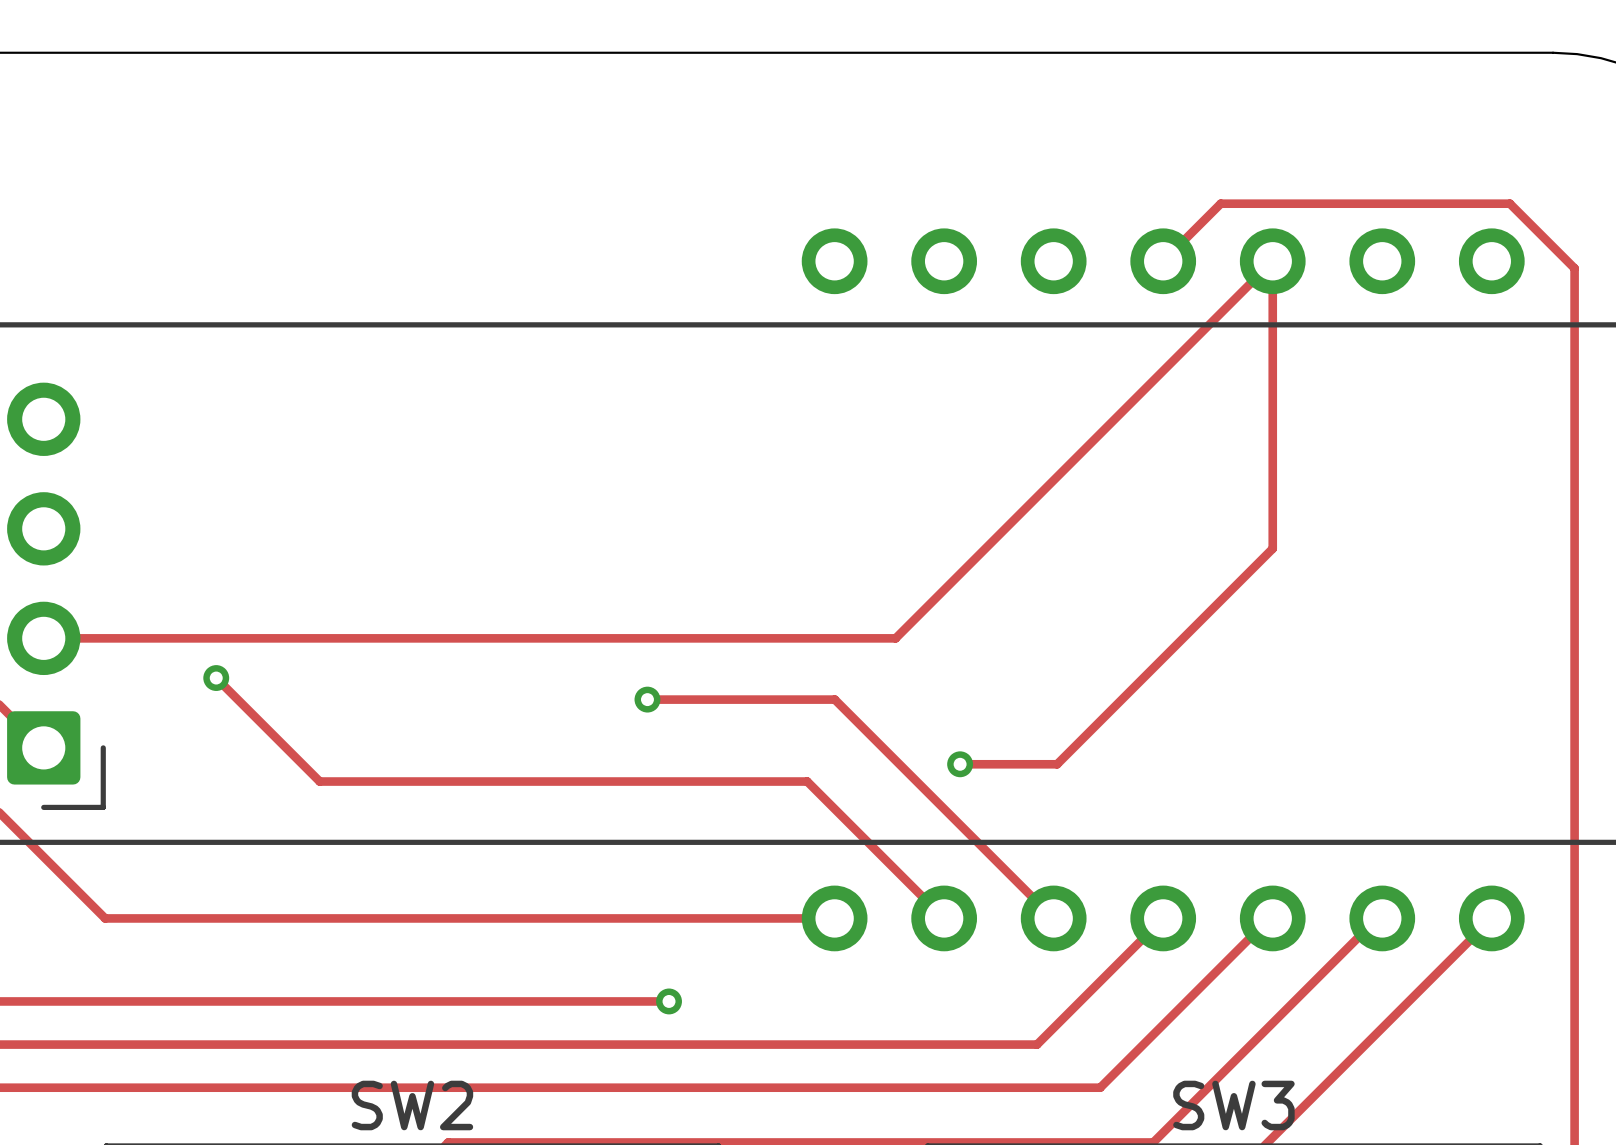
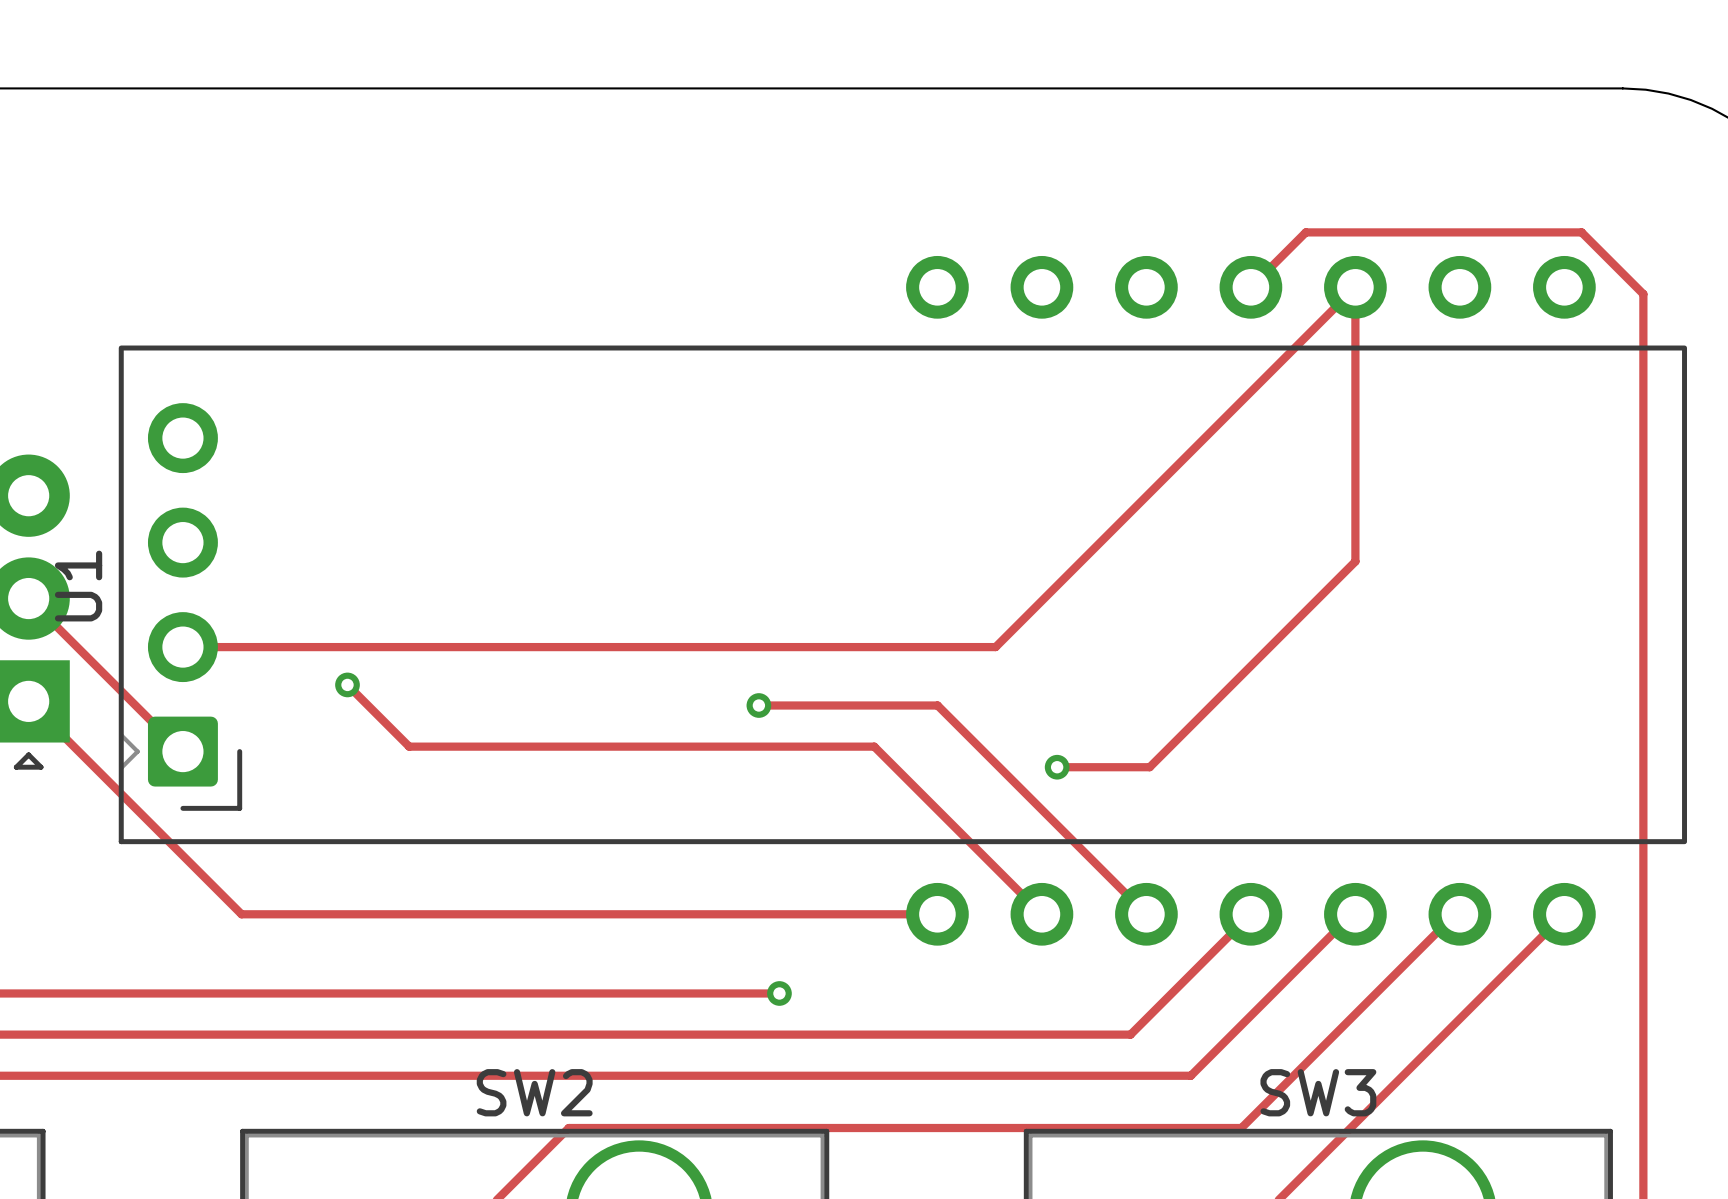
track: (280, 742) (319, 781) (807, 781) -> (409, 746) (874, 746) (911, 783)

